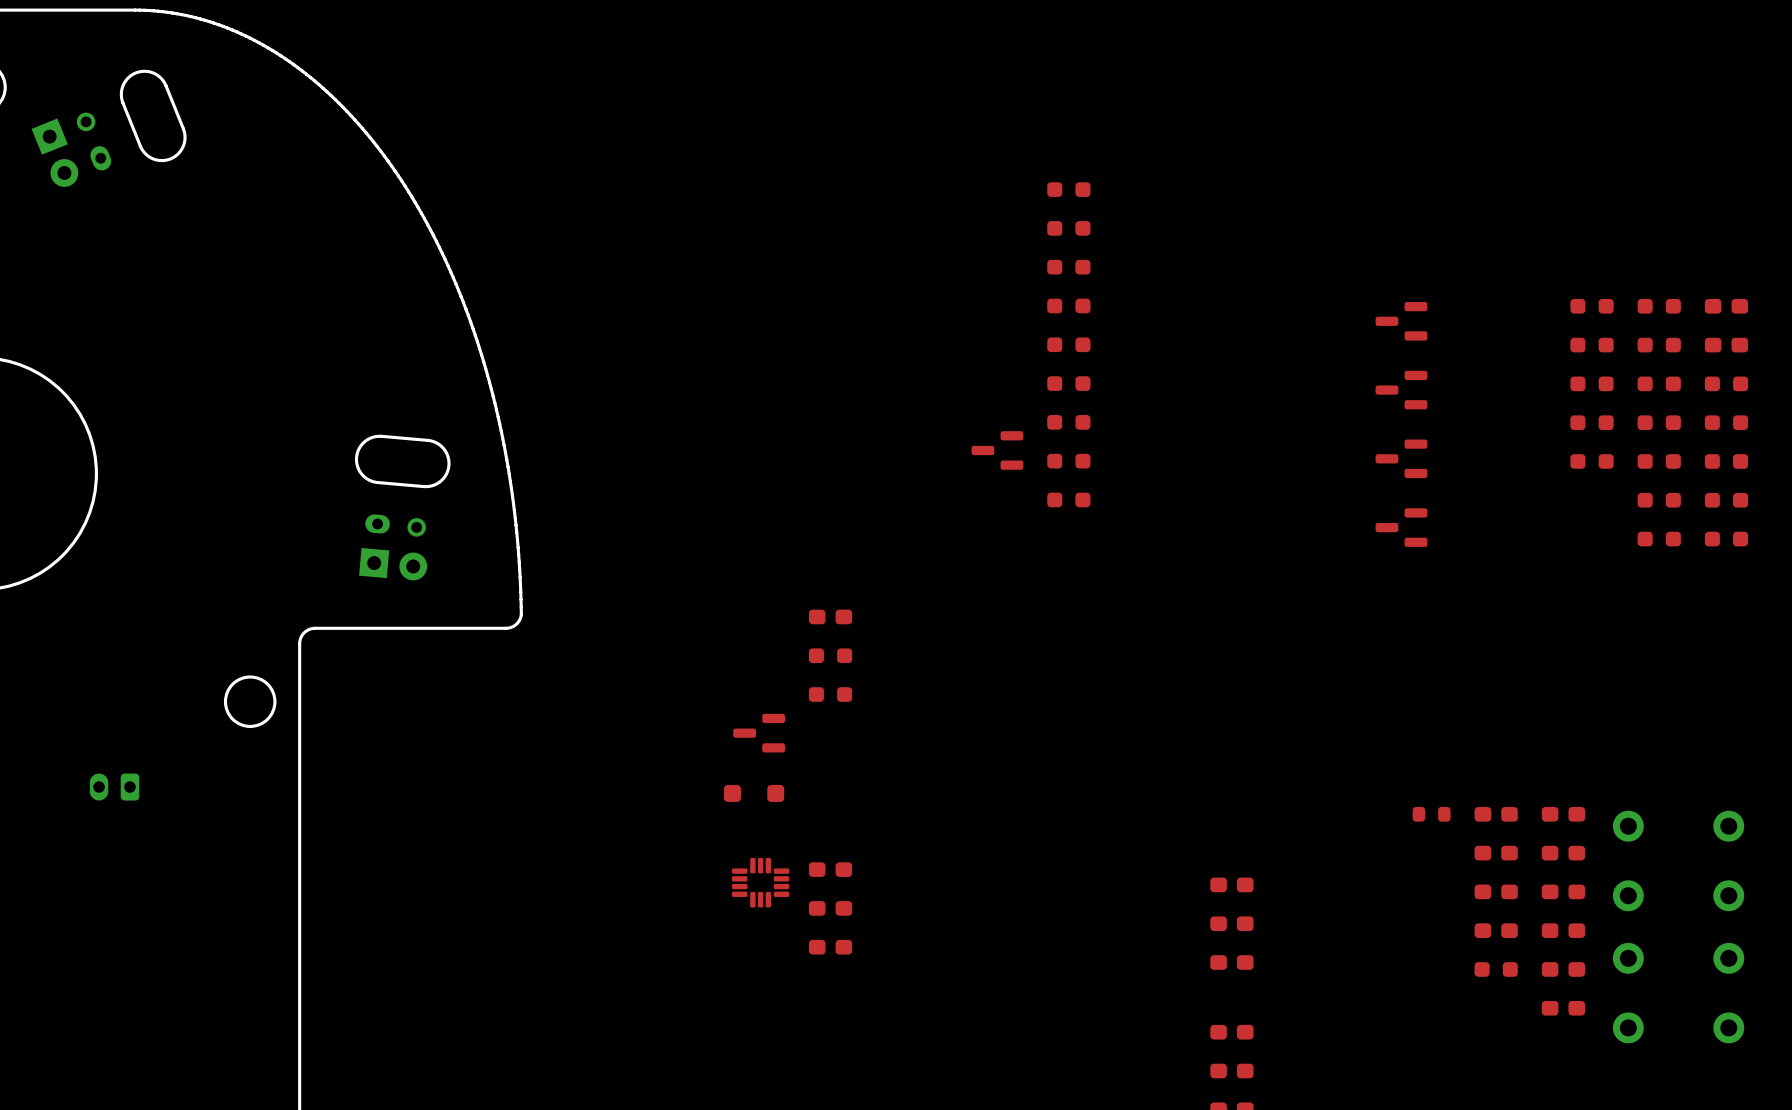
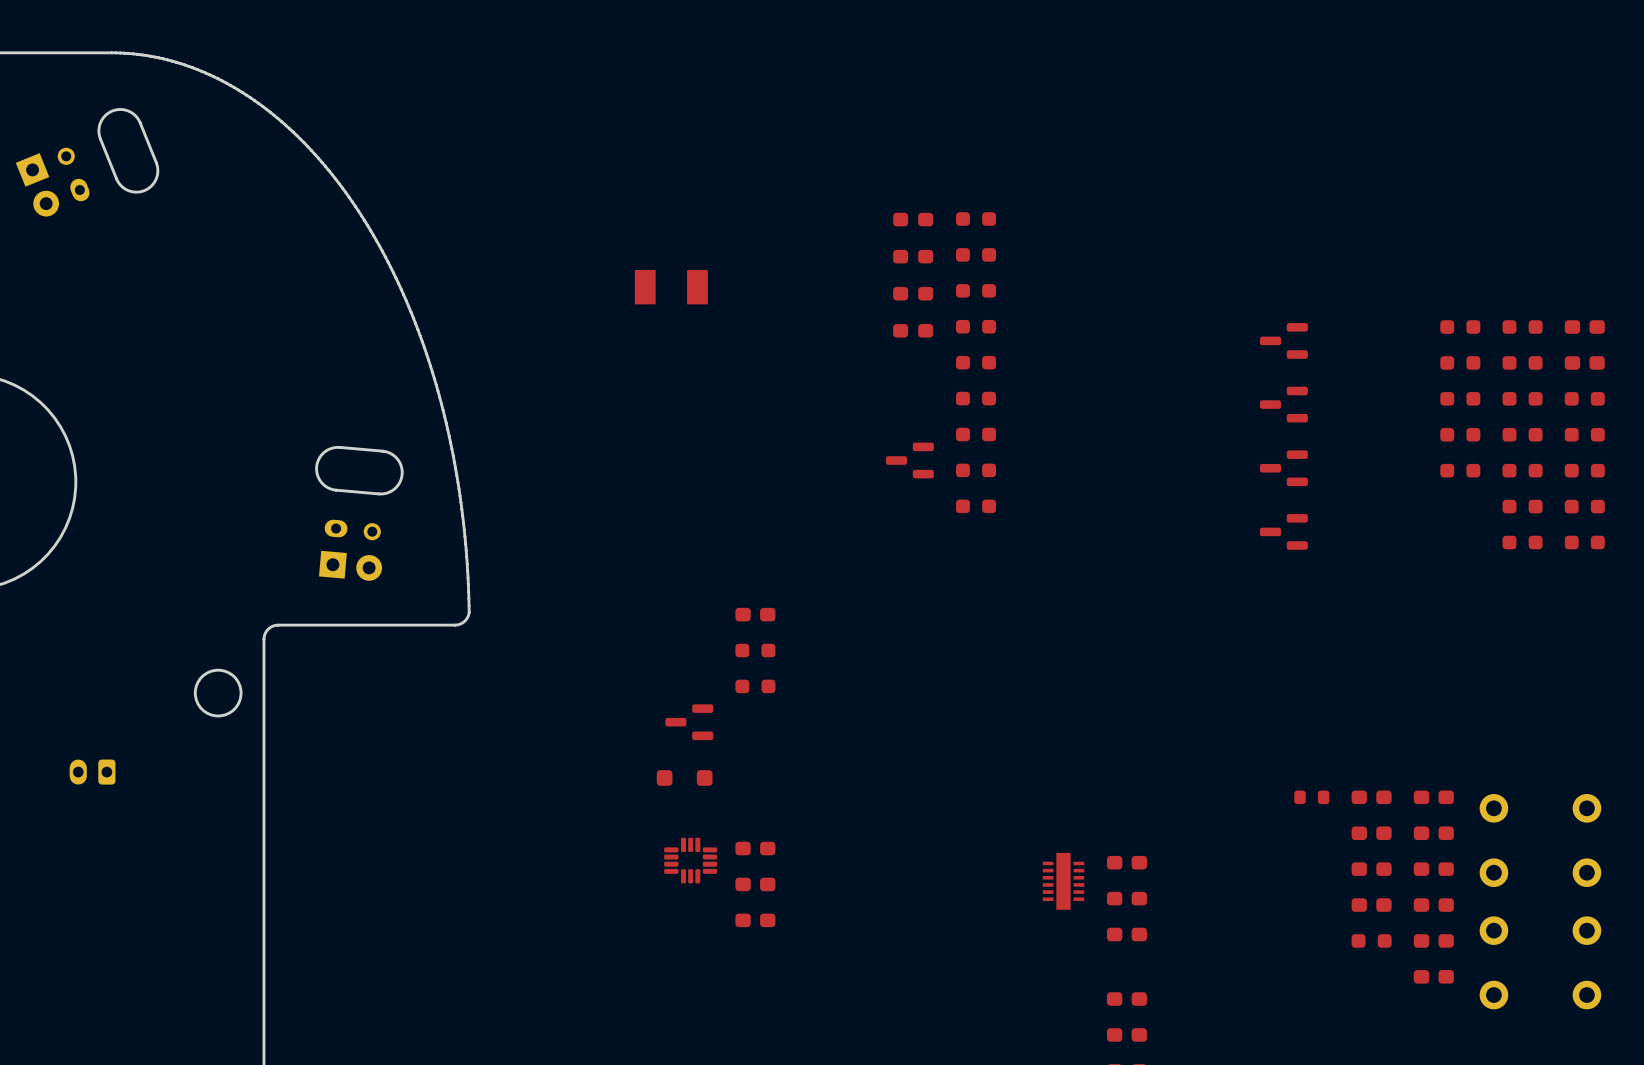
part: none -> (913, 219)
part: none -> (913, 256)
part: none -> (671, 287)
part: none -> (913, 293)
part: none -> (913, 330)
part: none -> (1063, 881)

